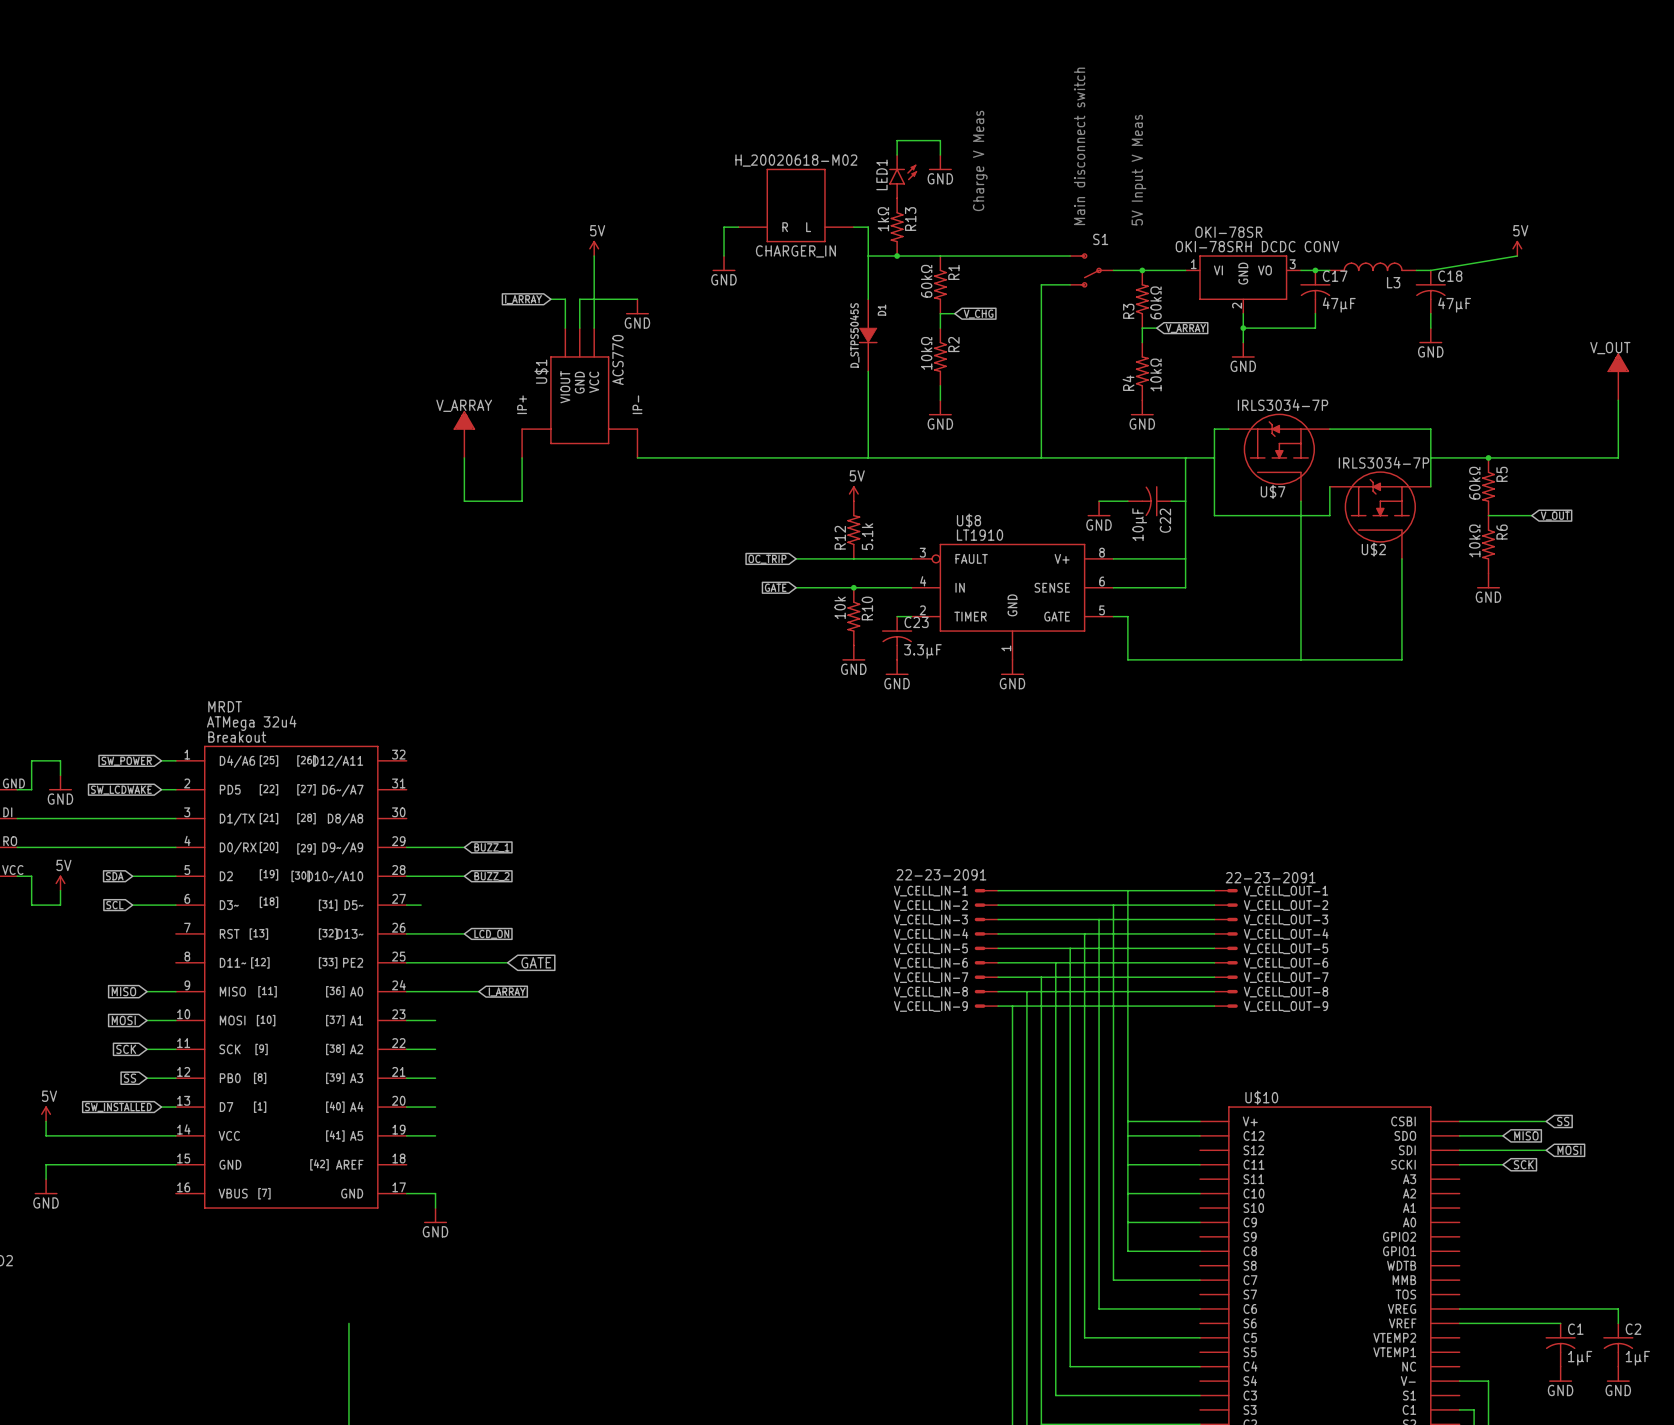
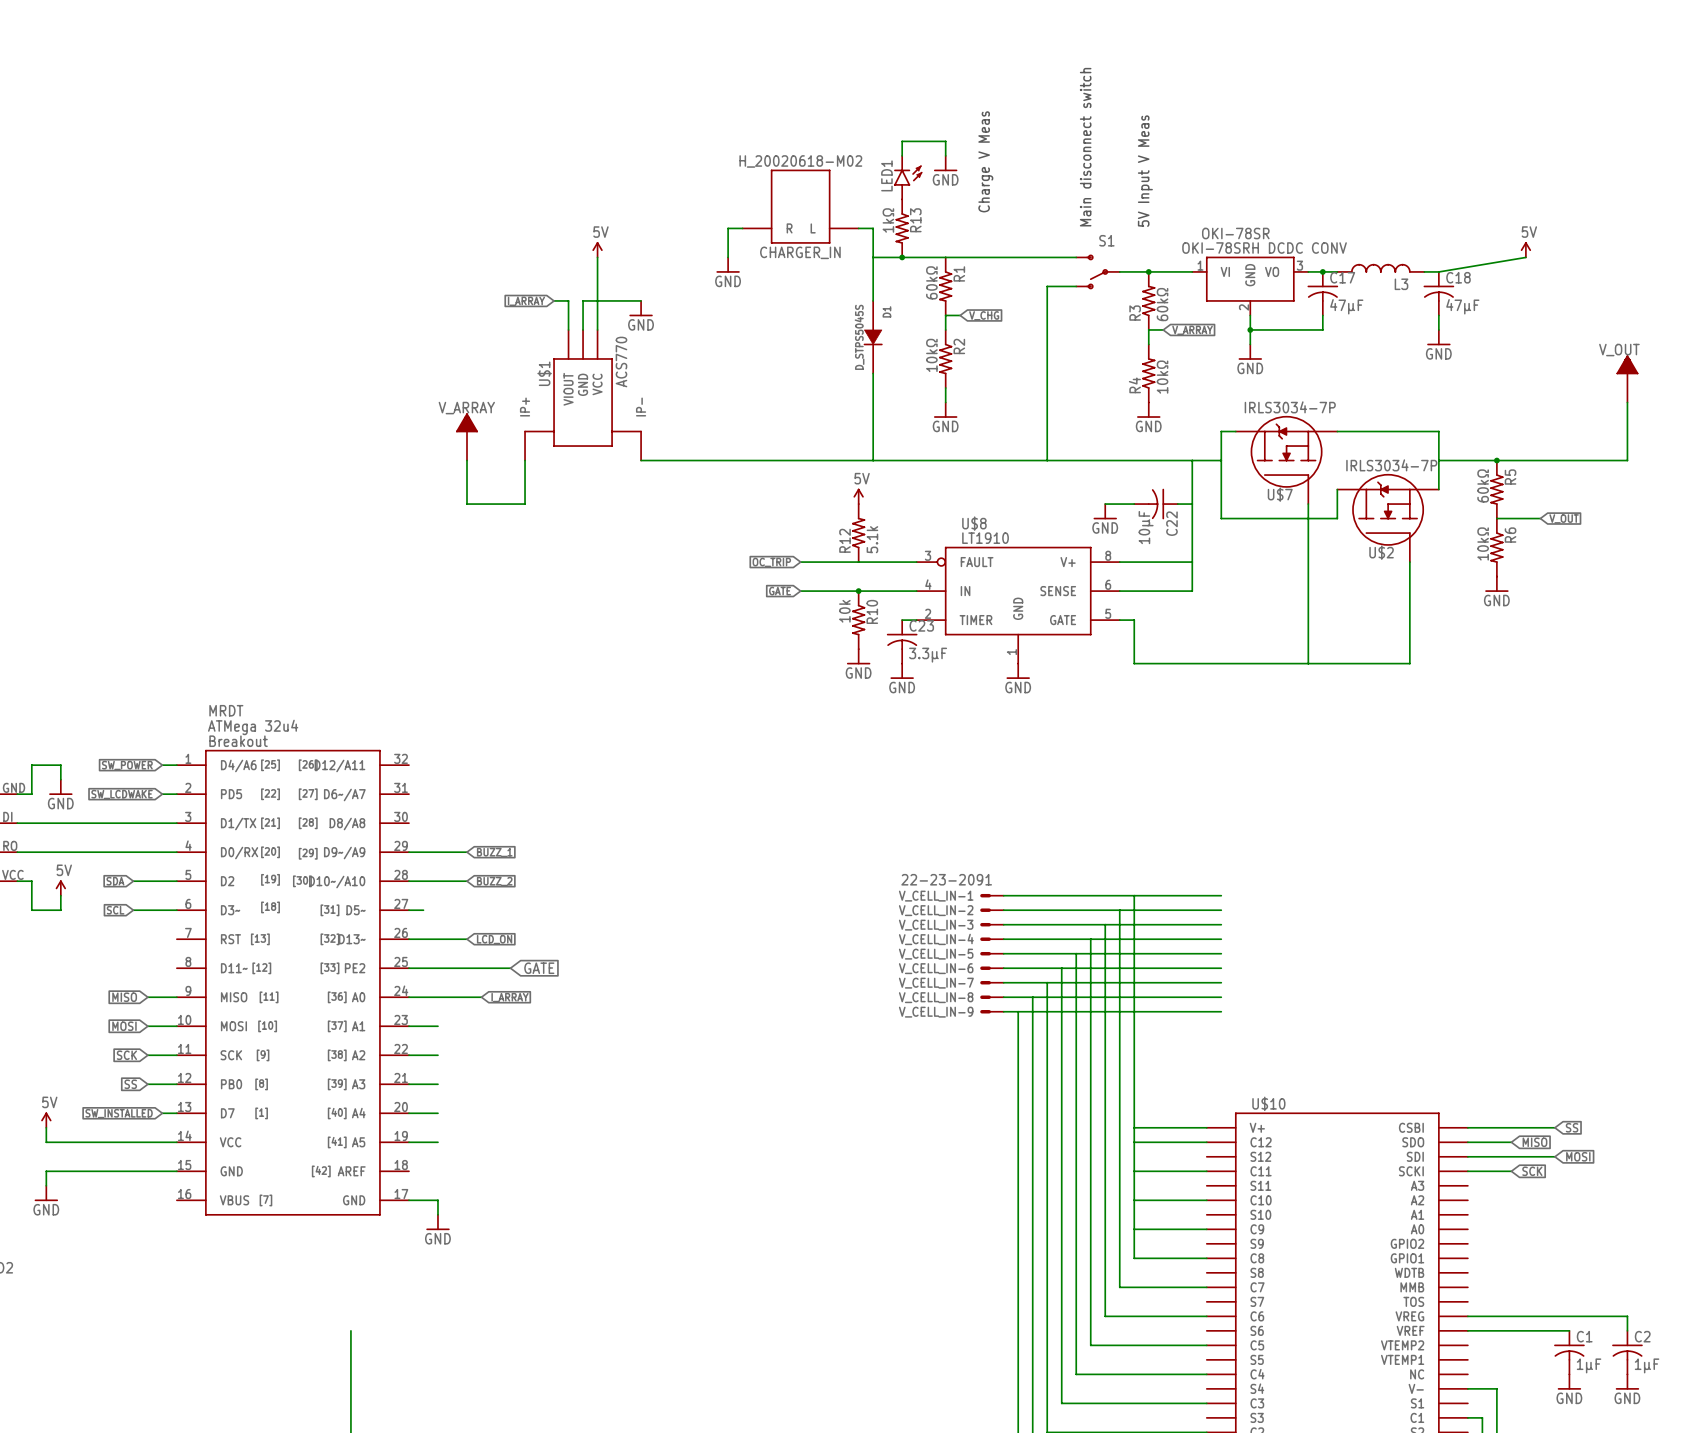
V_CELL_OUT-1: 22-23-2091 (1226, 890) -> none
V_CELL_OUT-2: (1226, 905) -> none
V_CELL_OUT-3: (1226, 919) -> none
V_CELL_OUT-4: (1226, 933) -> none
V_CELL_OUT-5: (1226, 948) -> none
V_CELL_OUT-6: (1226, 962) -> none
V_CELL_OUT-7: (1226, 977) -> none
V_CELL_OUT-8: (1226, 991) -> none
V_CELL_OUT-9: (1226, 1006) -> none

